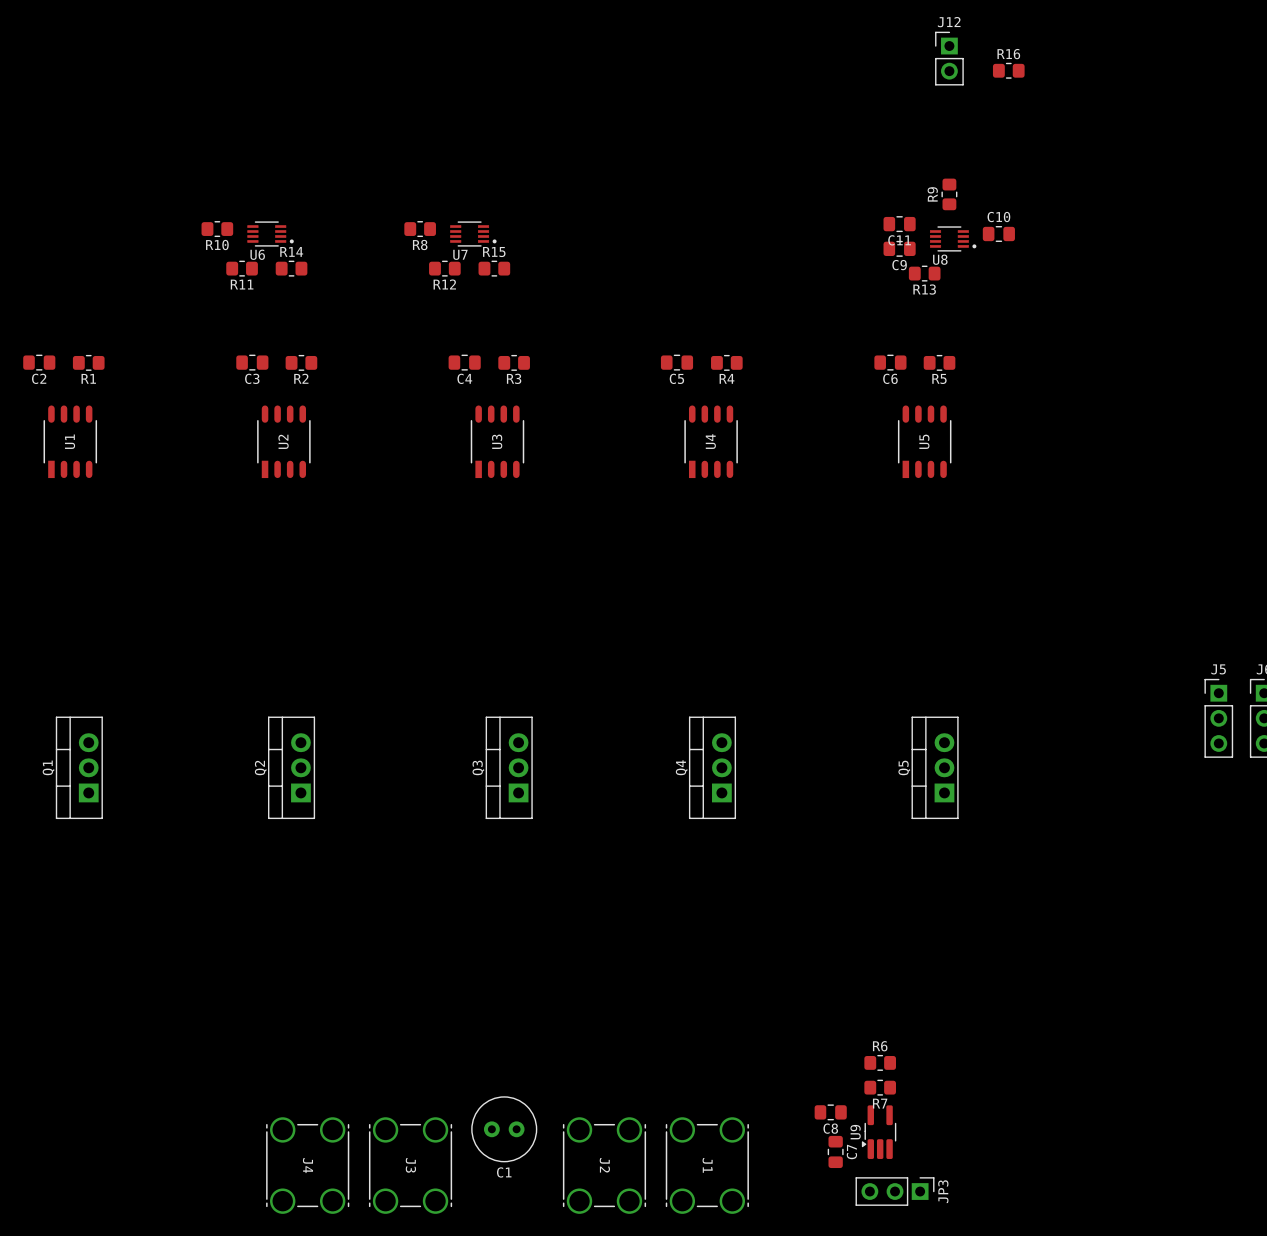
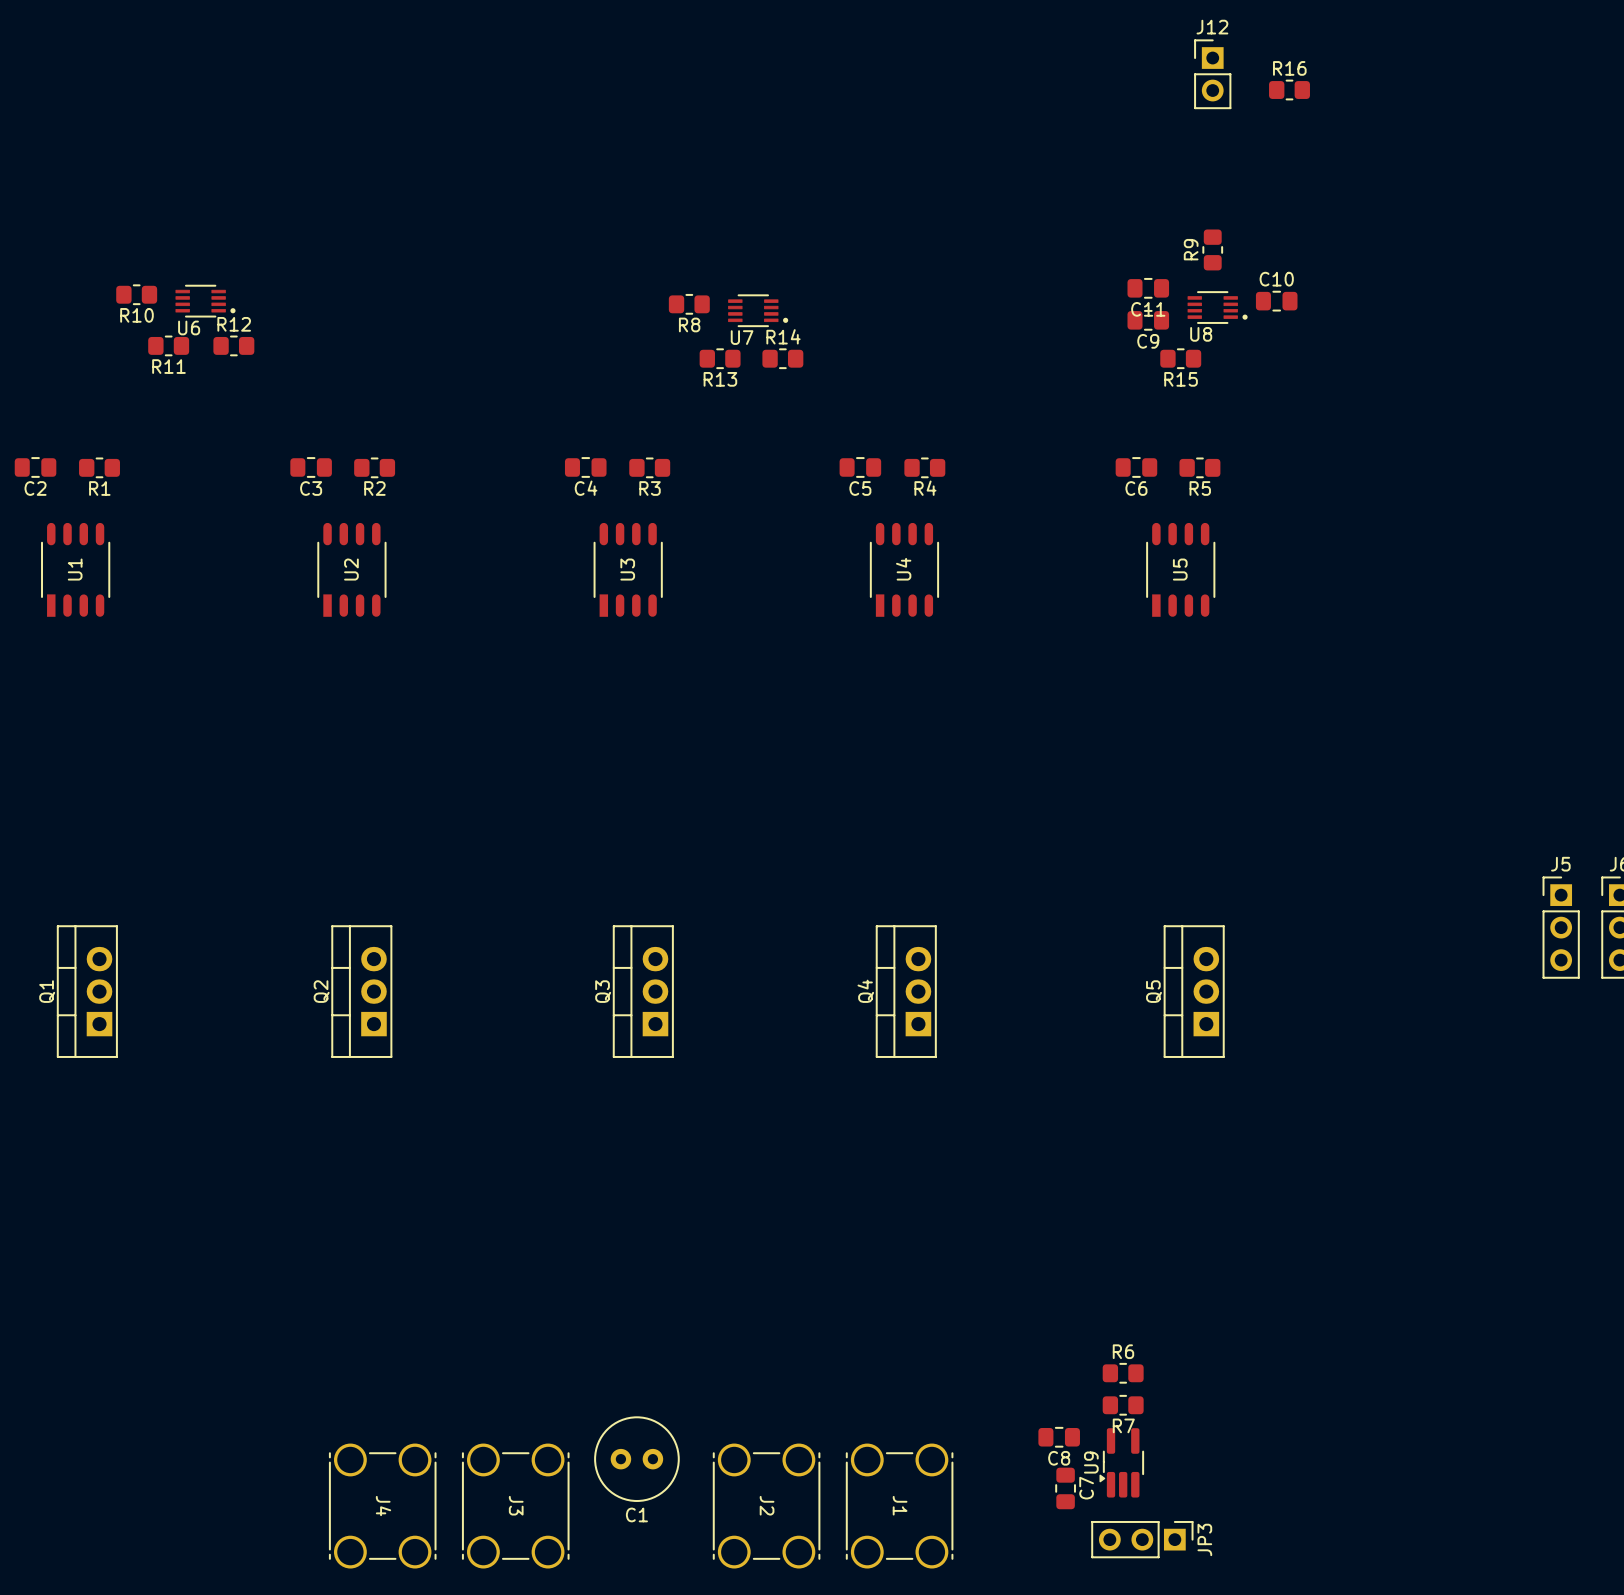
R10 position: (217, 229) -> (136, 294)
R8 position: (420, 229) -> (689, 304)
U6 position: (270, 233) -> (205, 301)
U7 position: (473, 233) -> (758, 310)
R15 name position: R15 (494, 252) -> R15 (1181, 379)
R11 position: (242, 268) -> (168, 345)
R14 position: (291, 268) -> (782, 358)
R12 position: (444, 268) -> (233, 345)
R15 position: (494, 268) -> (1180, 358)
R13 position: (924, 273) -> (720, 358)
R12 name position: R12 (444, 284) -> R12 (234, 324)

